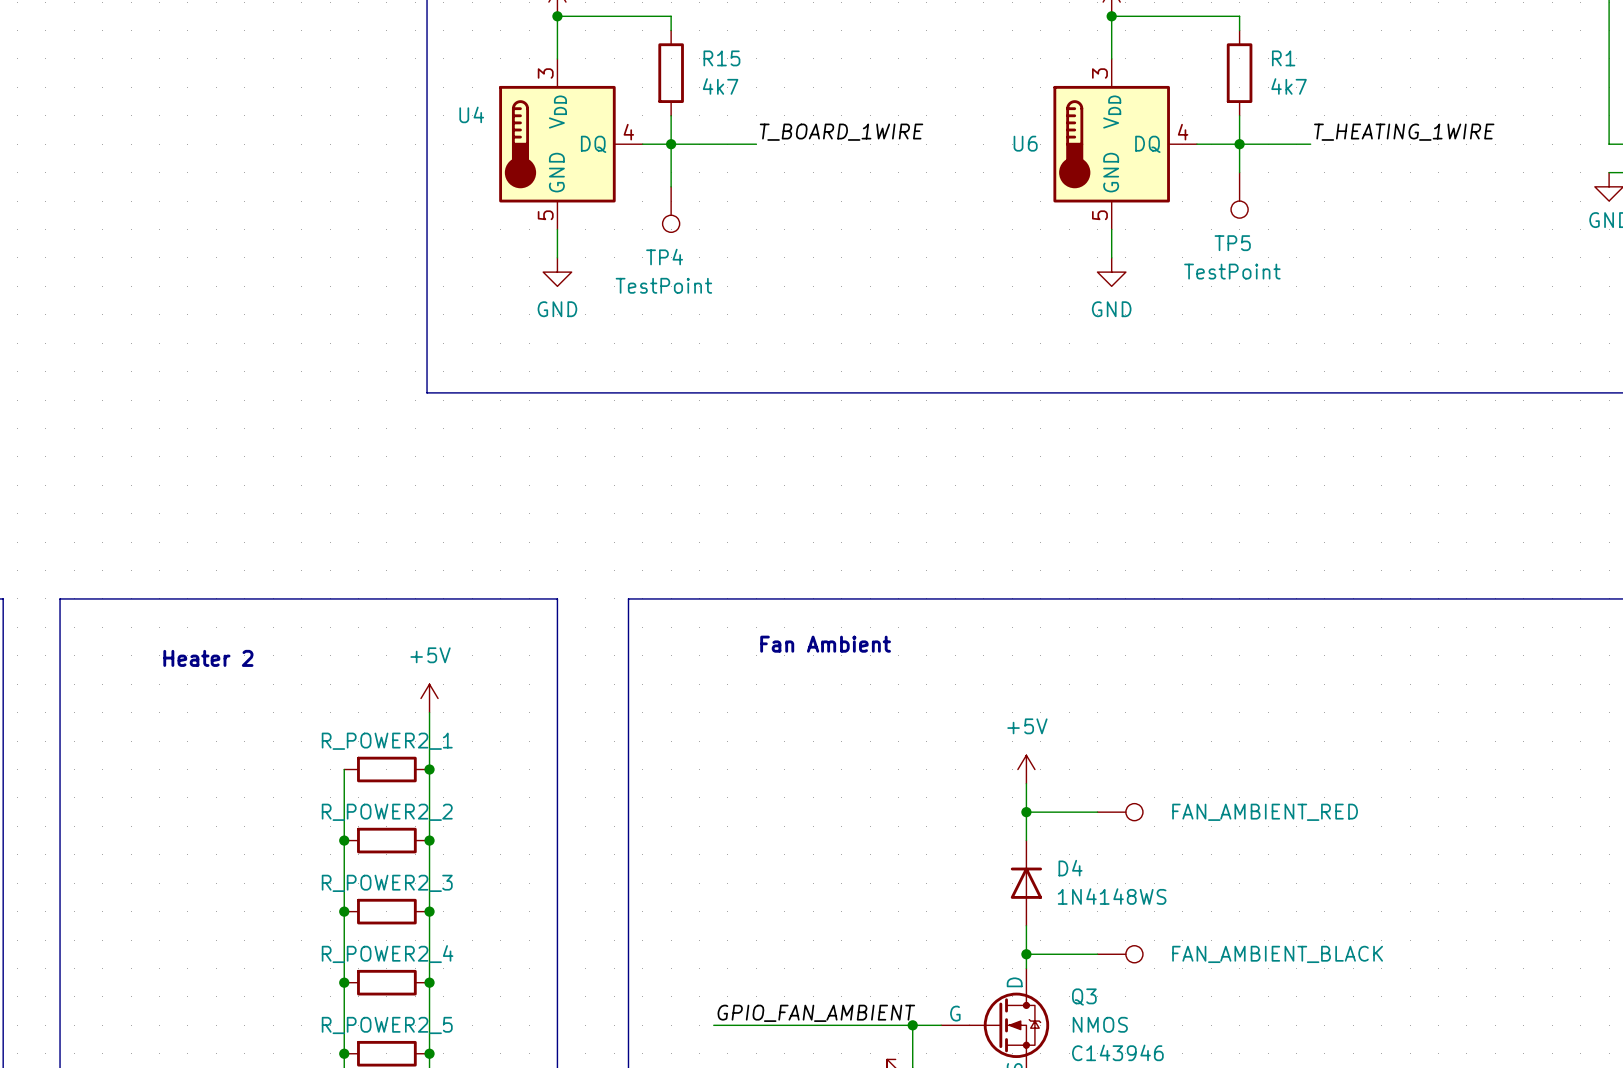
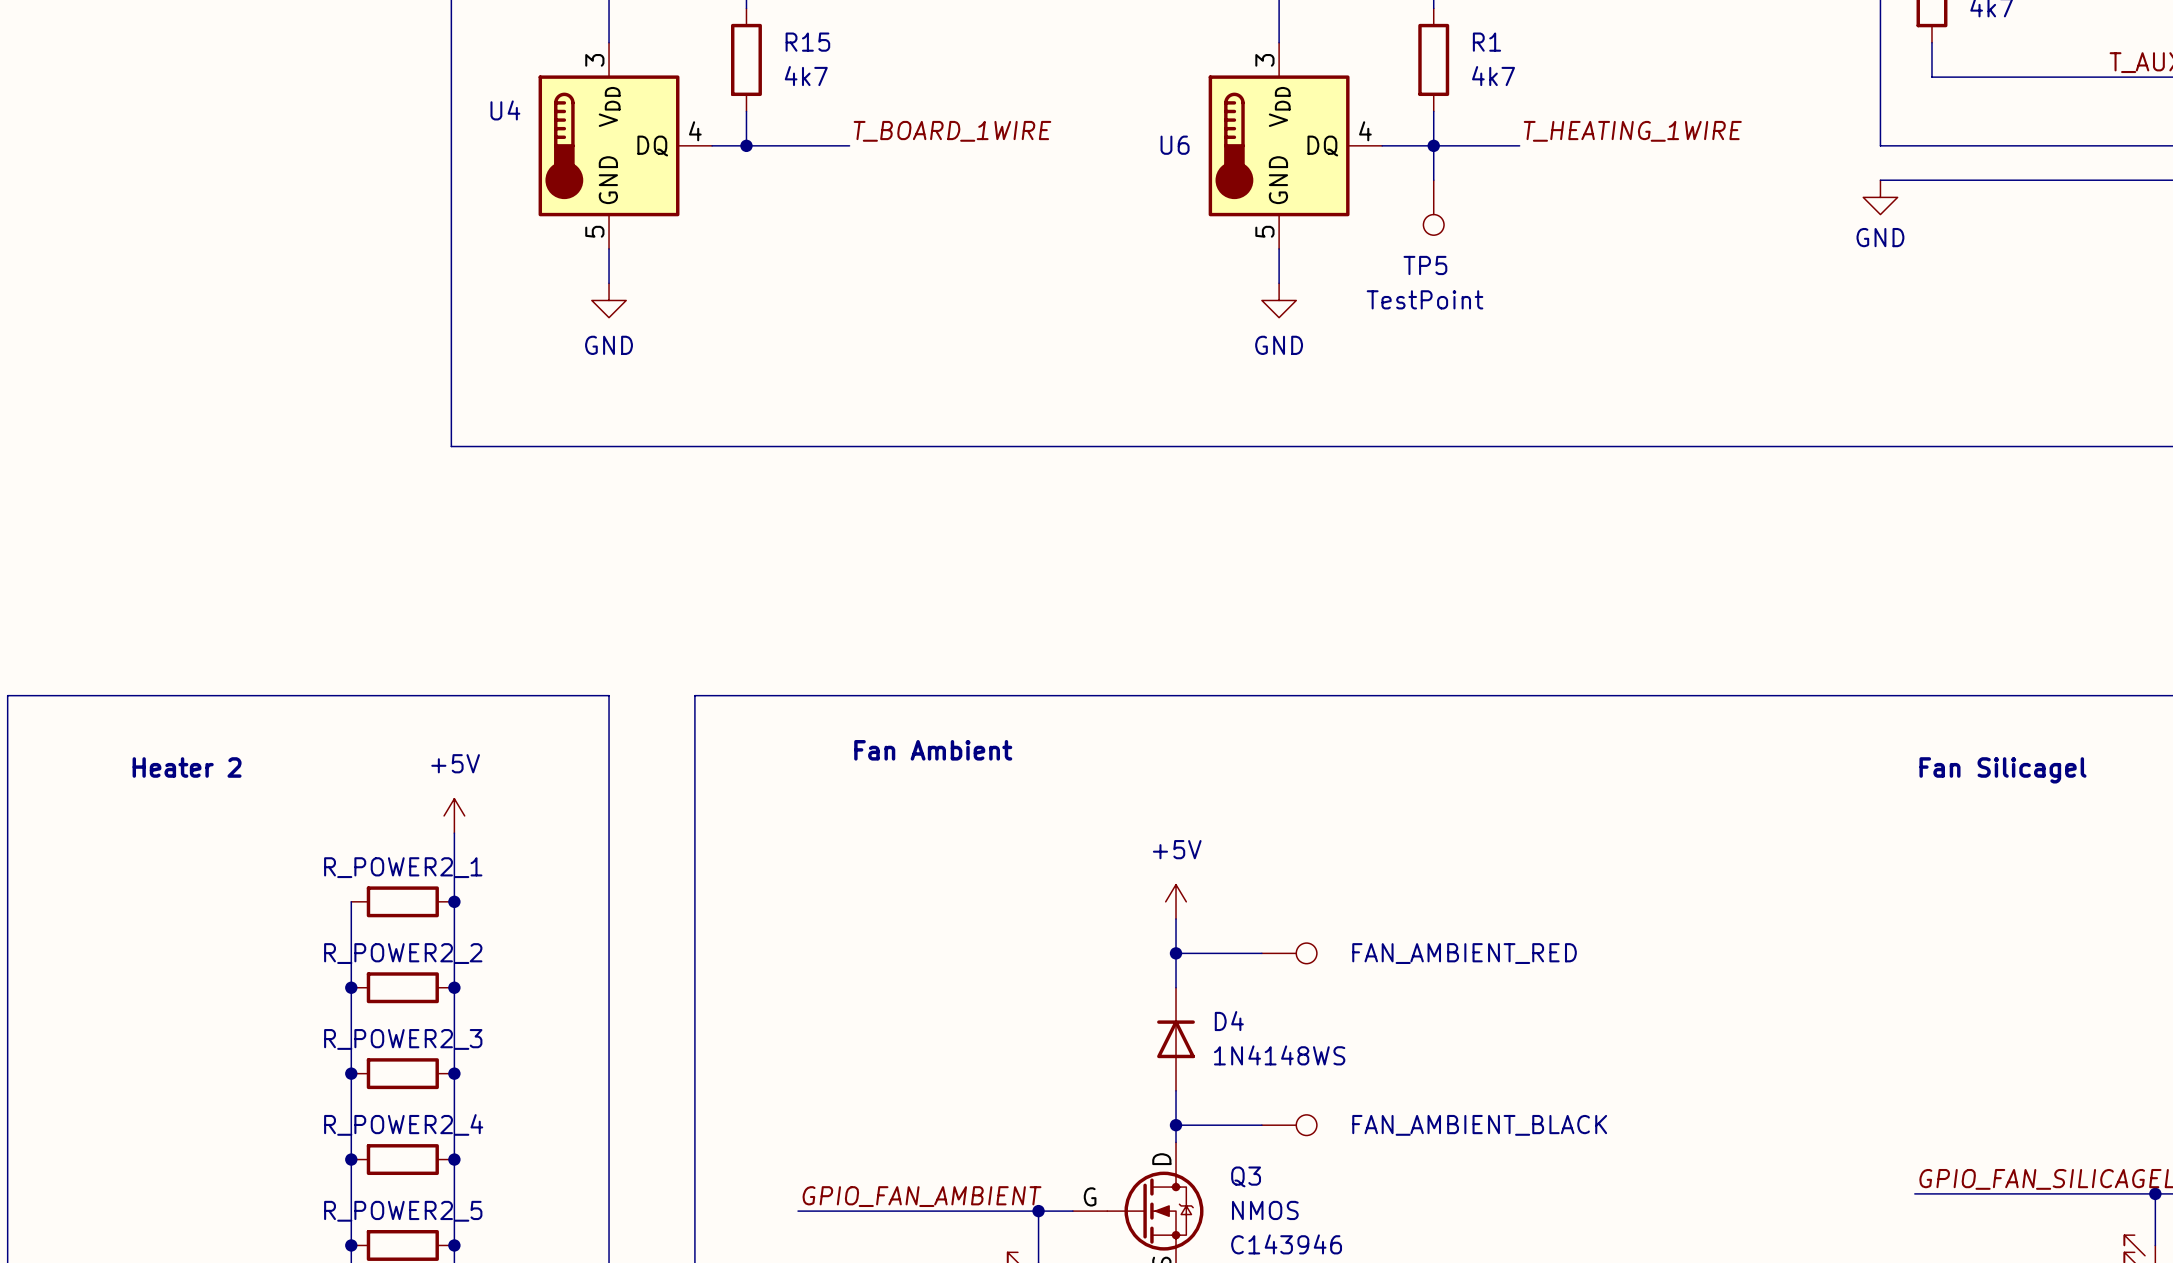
wire: (671, 144) (671, 186) -> none
TP4: TestPoint (671, 209) -> none

